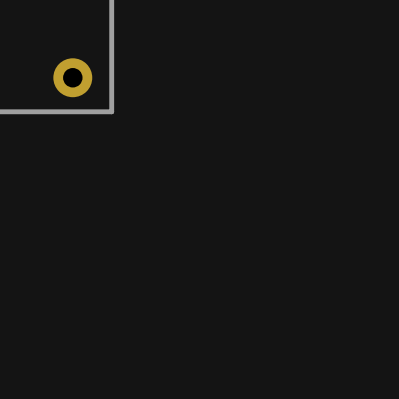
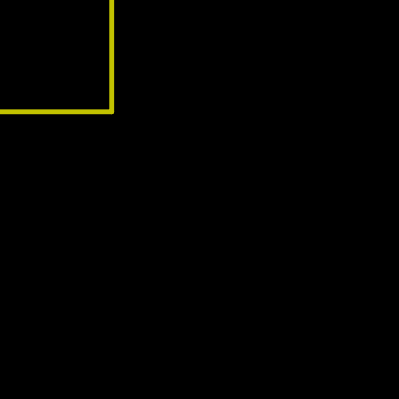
via: (72, 77) -> none

